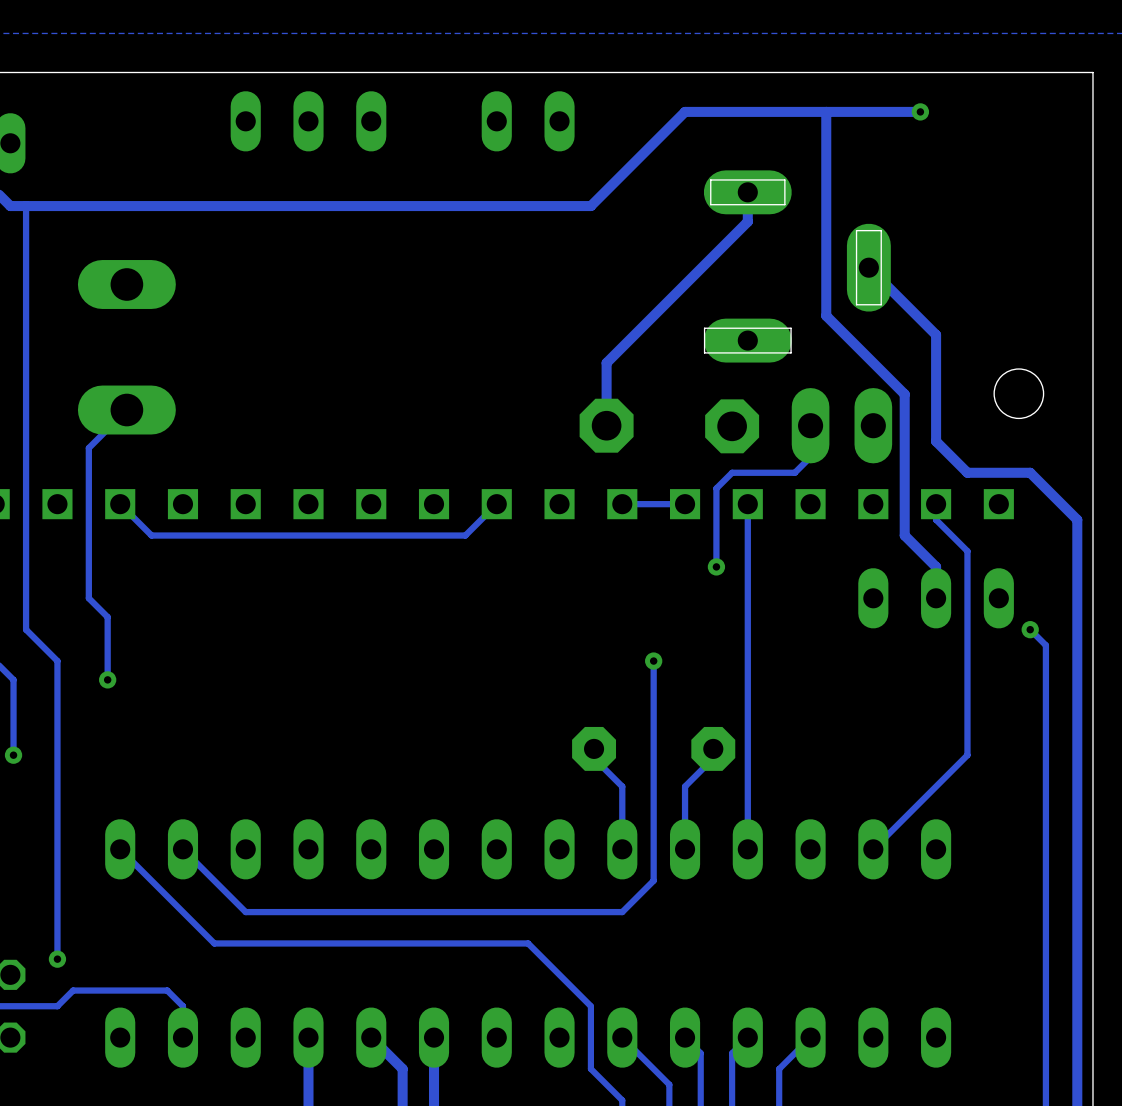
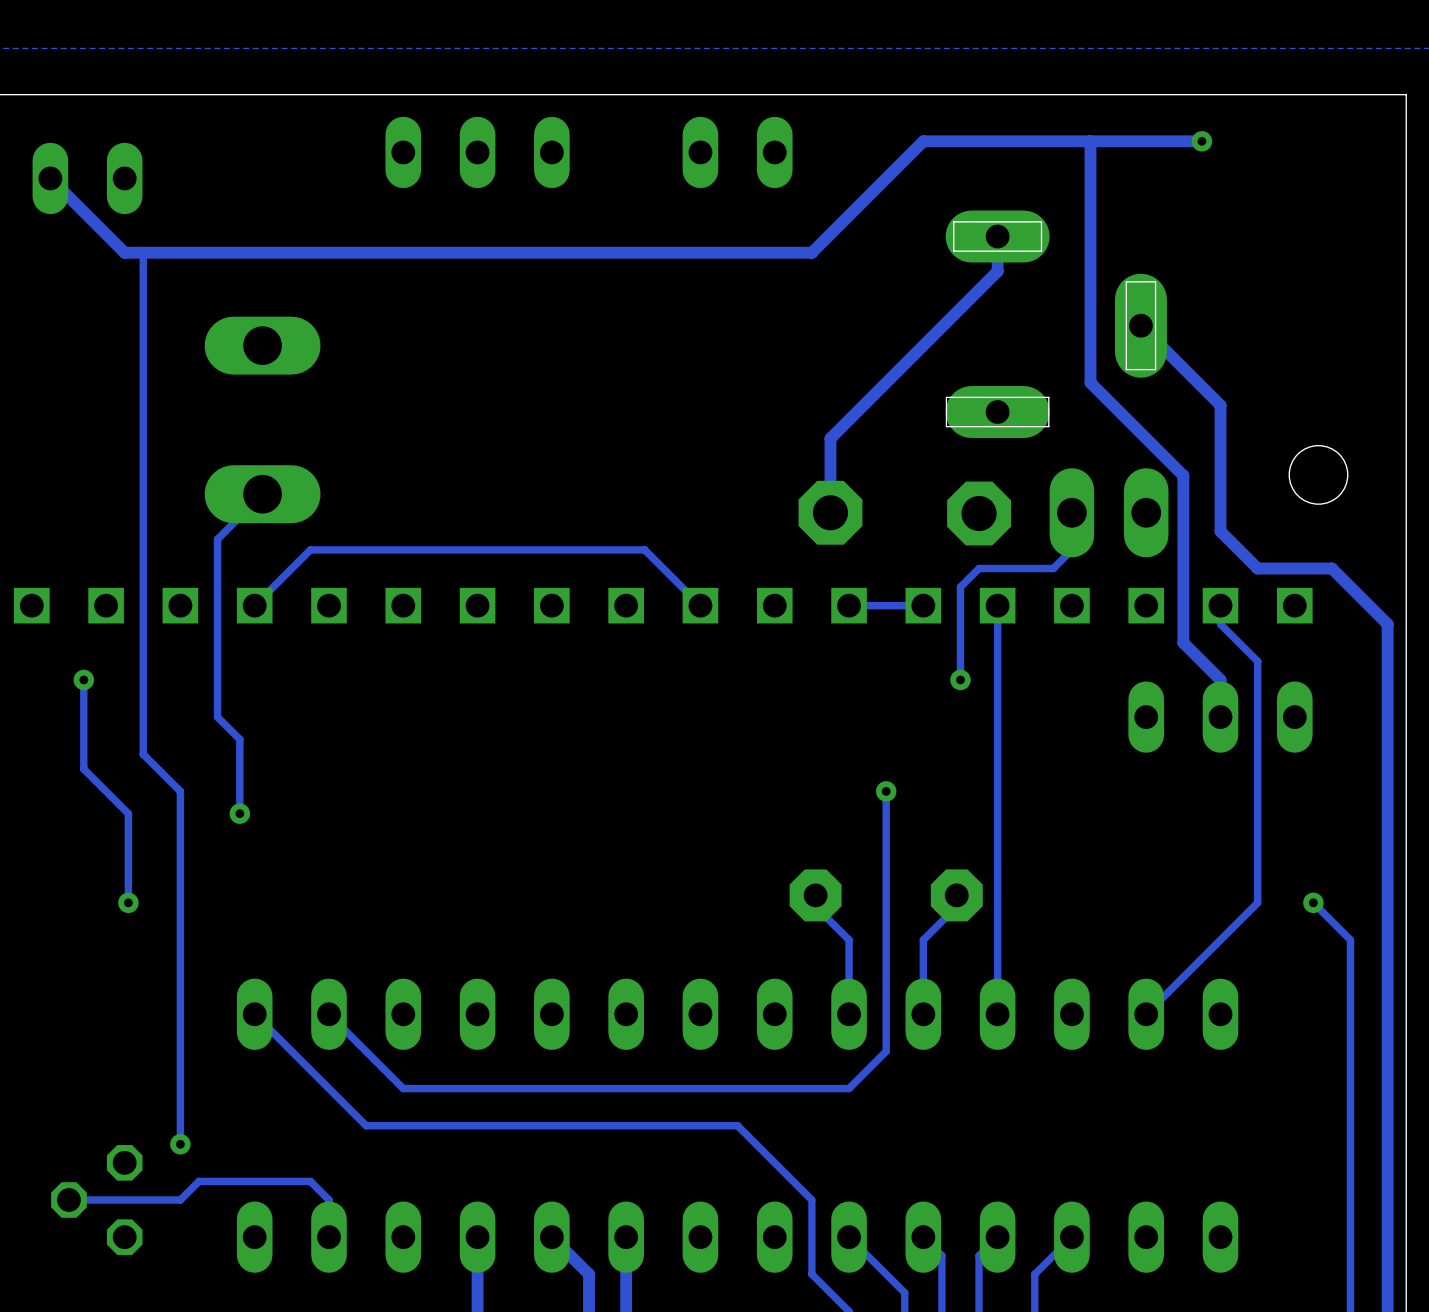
track: (496, 504) (465, 535) (151, 535) (120, 504) -> (700, 605) (644, 549) (310, 549) (254, 605)
track: (1030, 629) (1045, 645) (1045, 786) -> (1313, 902) (1350, 939)
via position: (1030, 629) -> (1313, 902)

